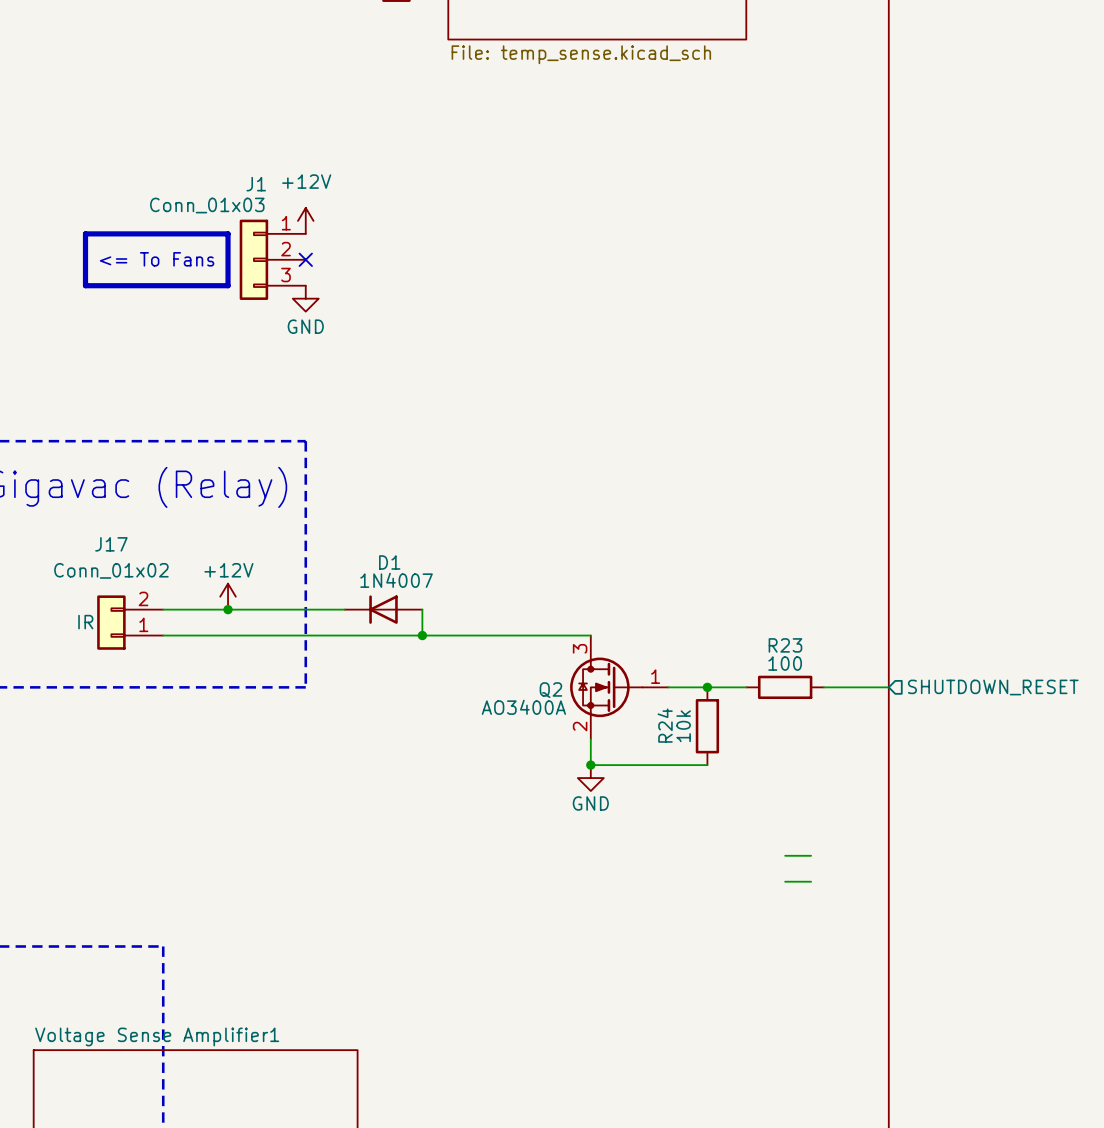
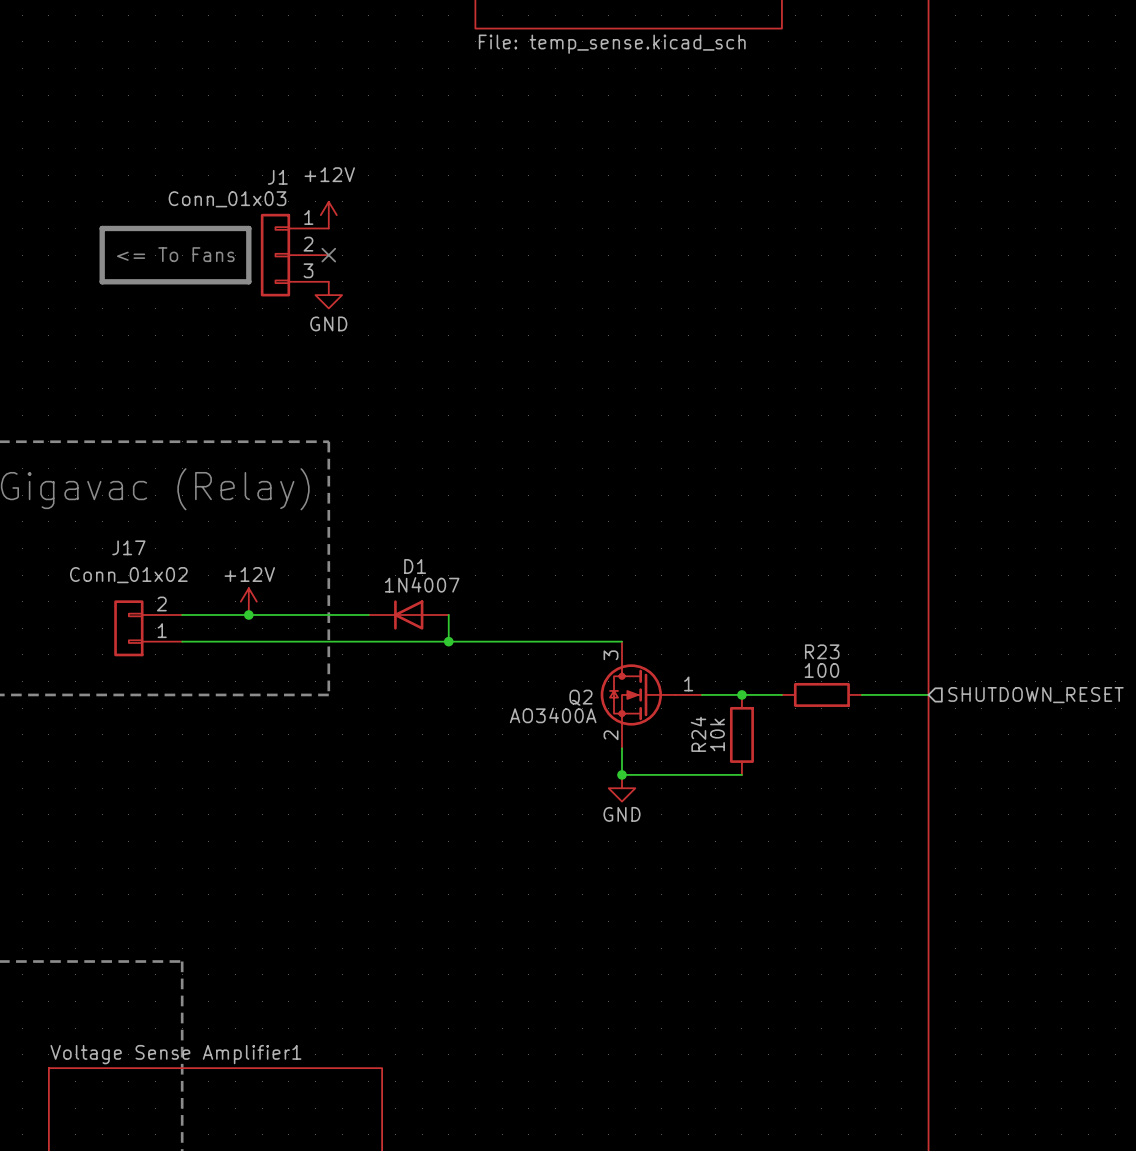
J17 text: IR (85, 622) -> none
wire: (785, 855) (811, 855) -> none
wire: (785, 881) (811, 881) -> none

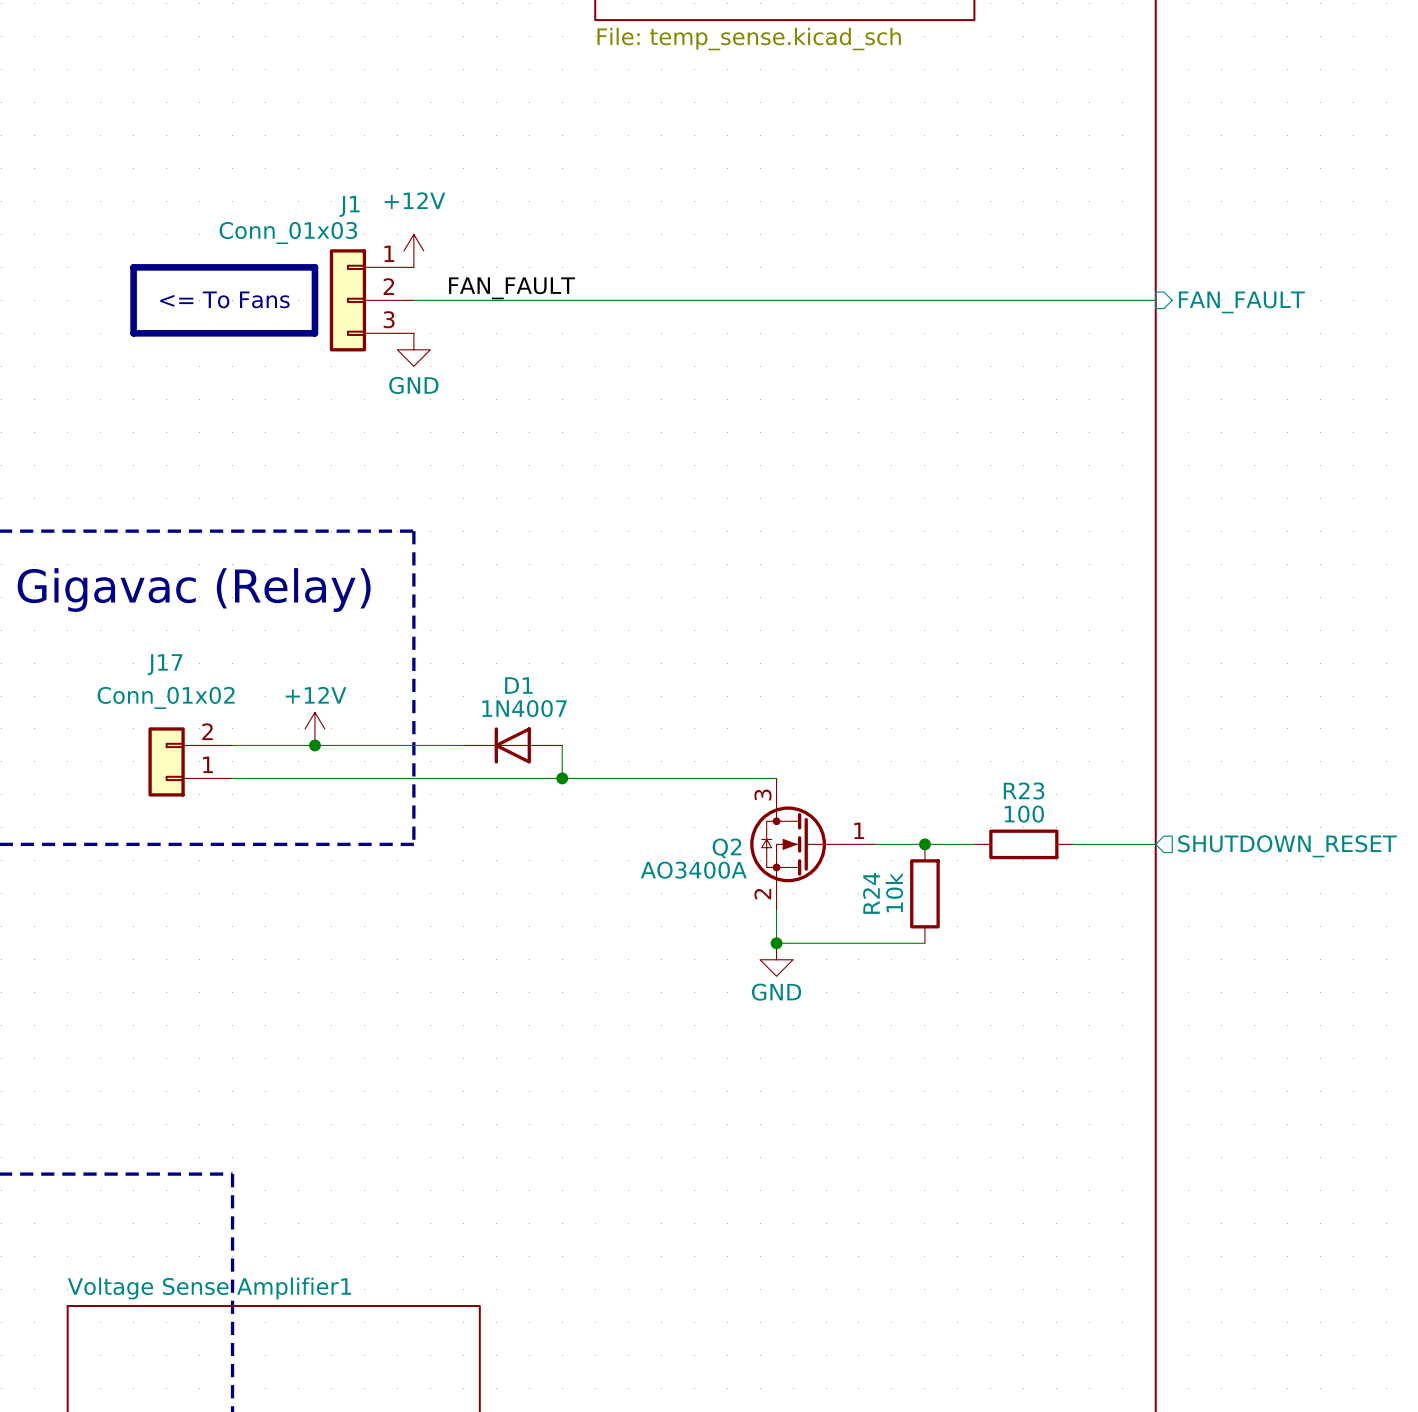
label: none -> FAN_FAULT (512, 288)
wire: none -> (413, 300) (1155, 300)
no-connect mark: (328, 255) -> none
sheet pin: none -> FAN_FAULT (1241, 302)

